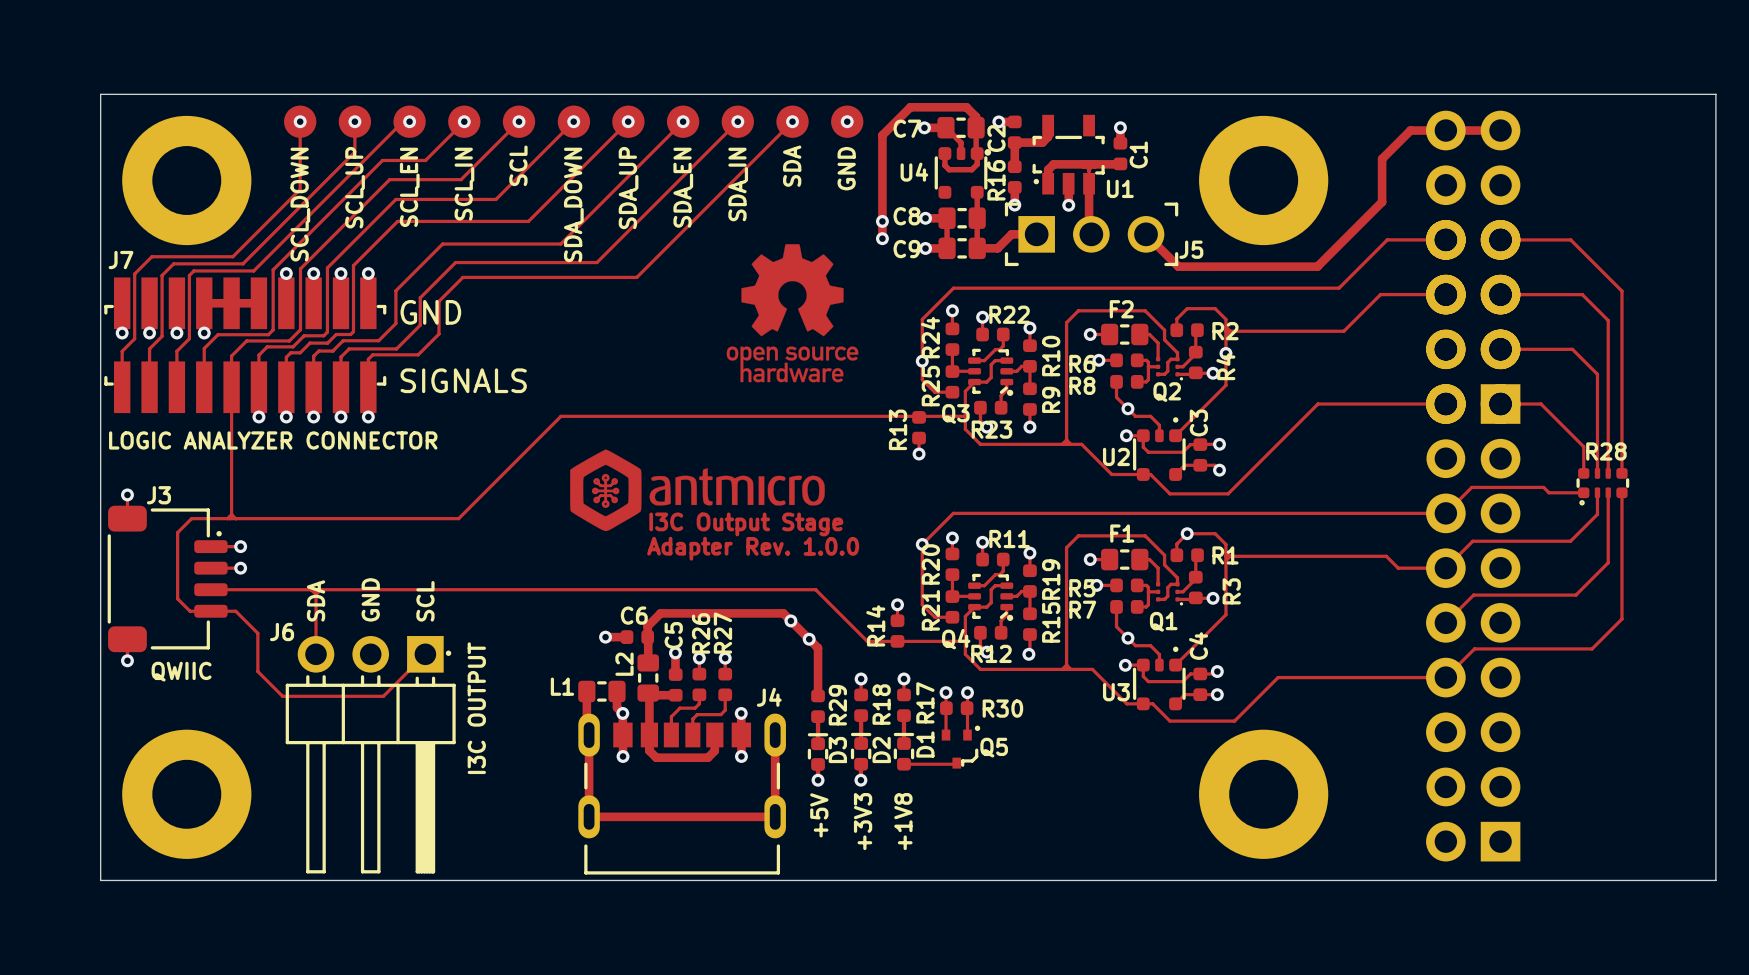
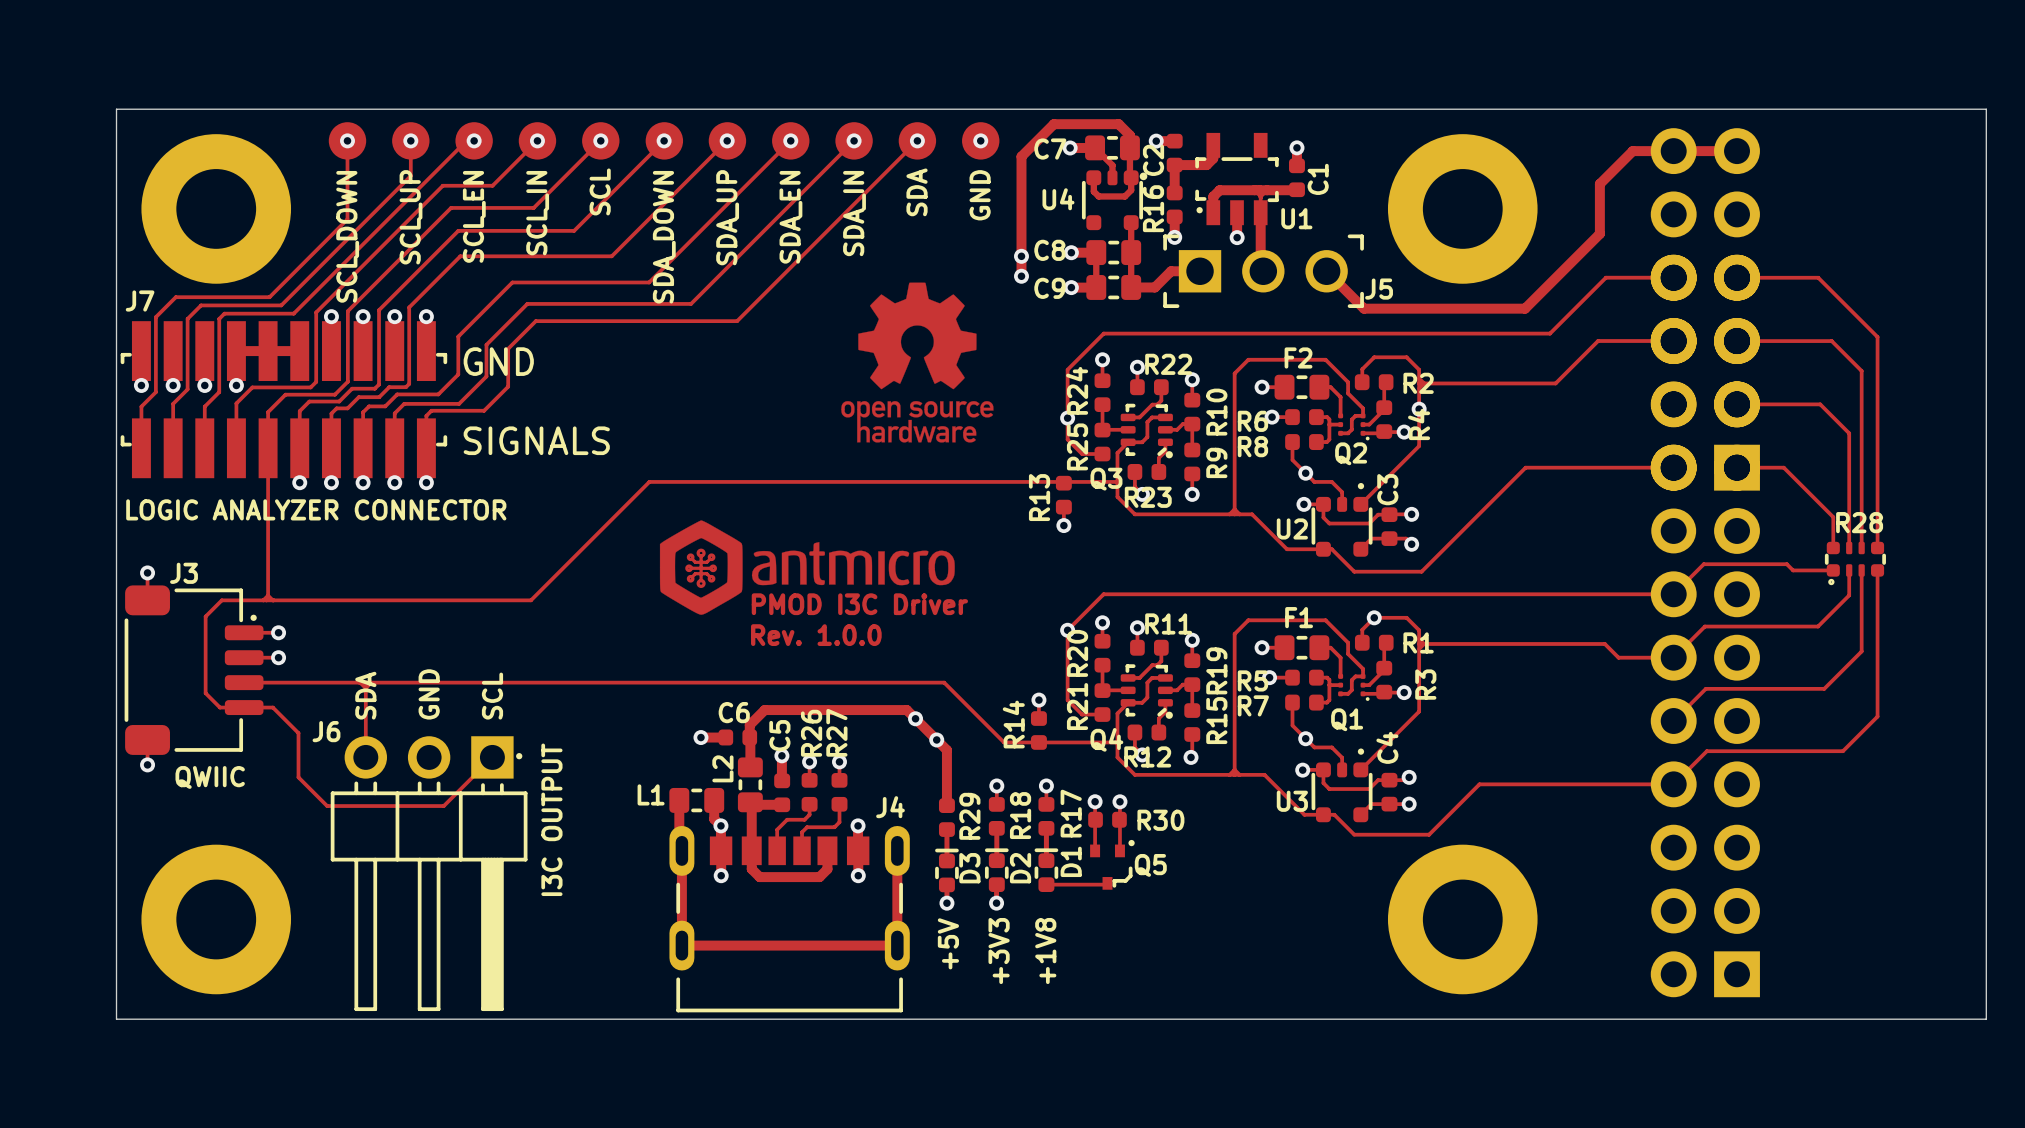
text: I3C Output Stage (746, 524) -> PMOD I3C Driver (859, 604)
text position: Rev. 1.0.0 (802, 546) -> Rev. 1.0.0 (816, 635)
text: Adapter (689, 548) -> none

